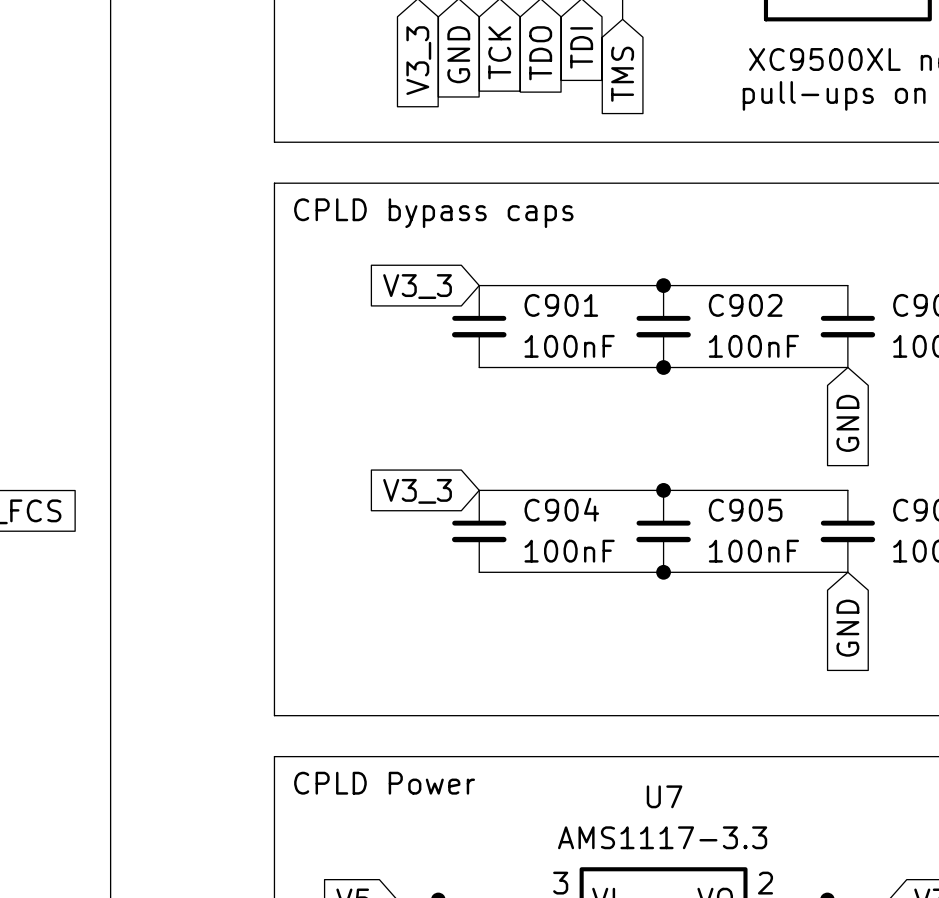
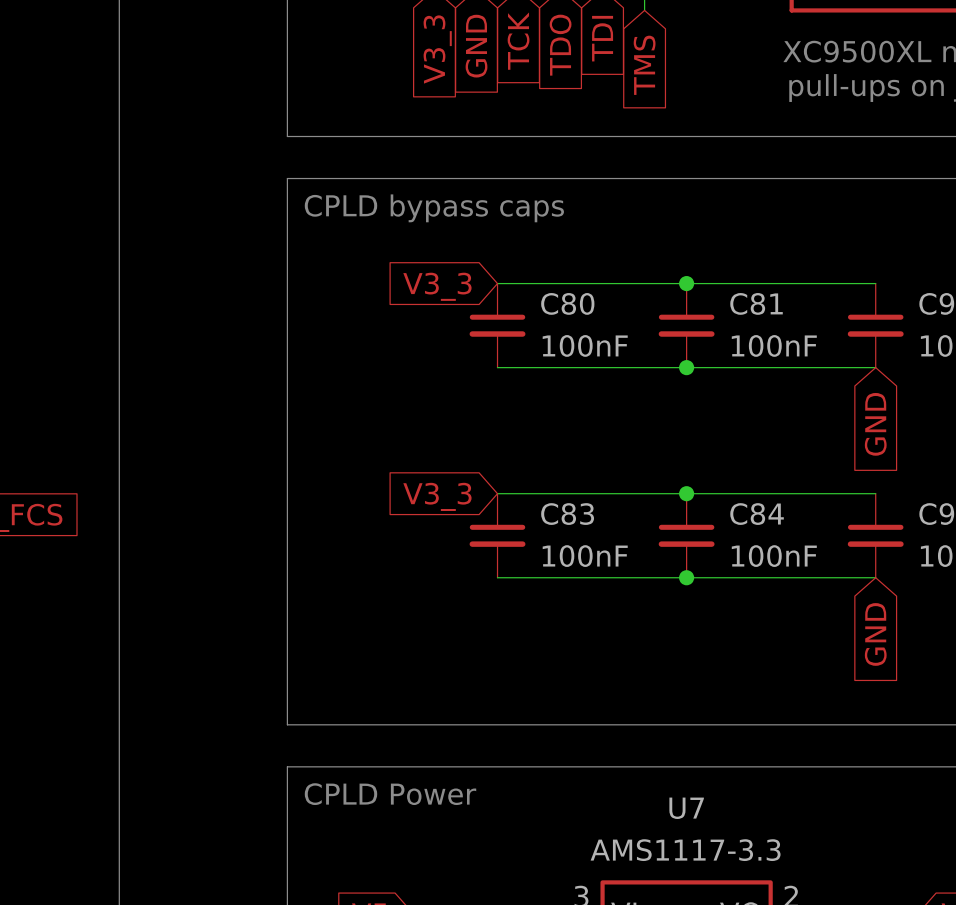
C901 name: C901 (561, 305) -> C80 (567, 303)
C902 name: C902 (745, 305) -> C81 (756, 303)
C904 name: C904 (561, 509) -> C83 (567, 514)
C905 name: C905 (745, 510) -> C84 (757, 514)

